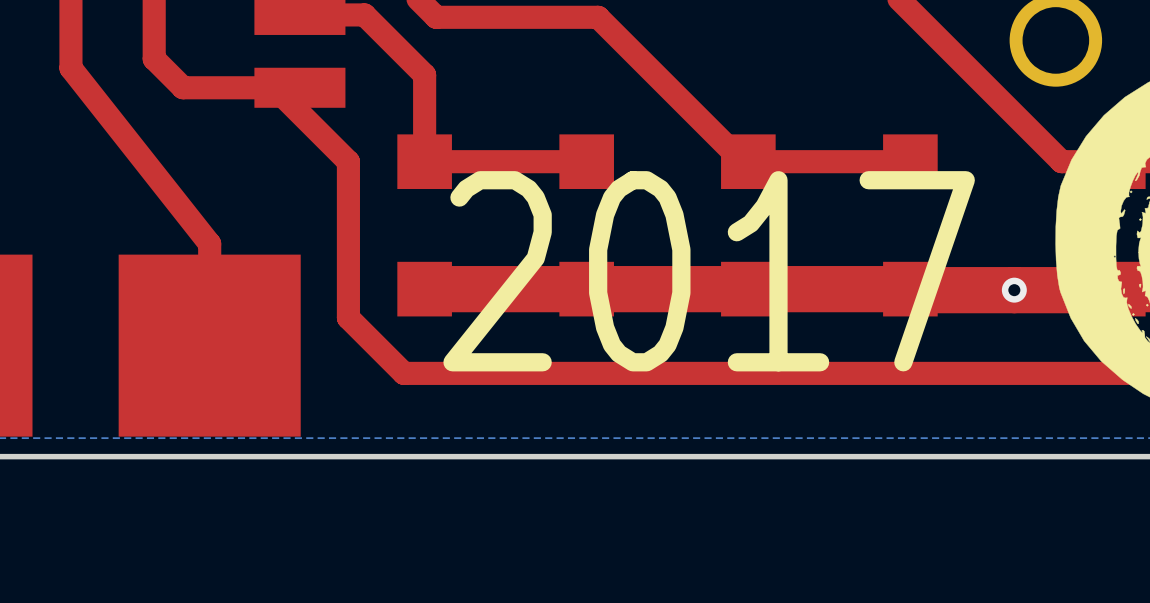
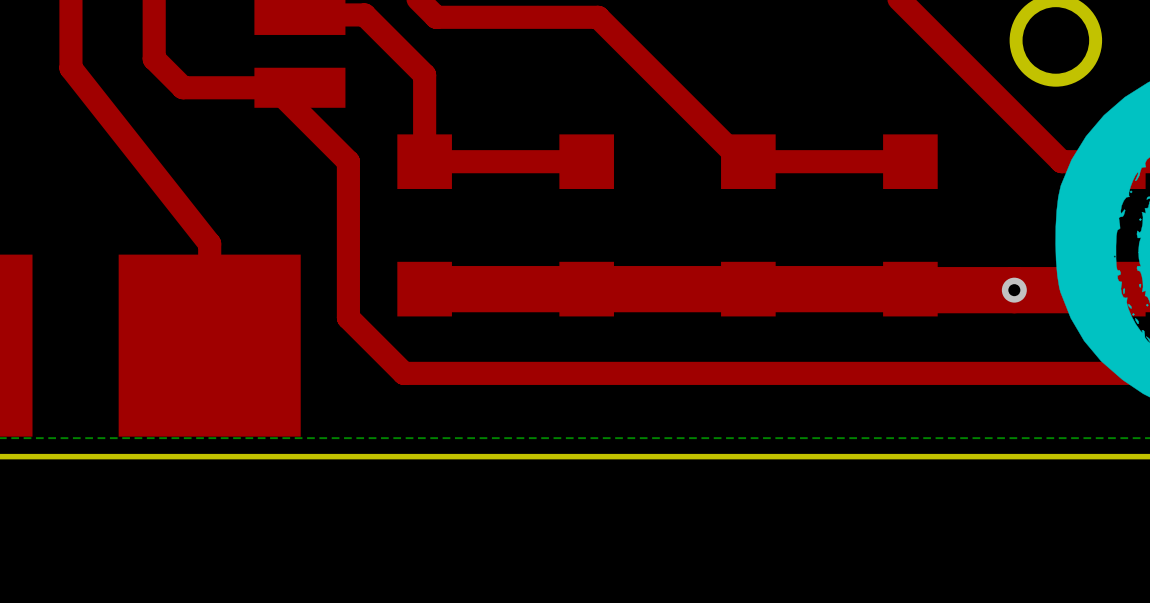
text: 2017 (709, 271) -> none

